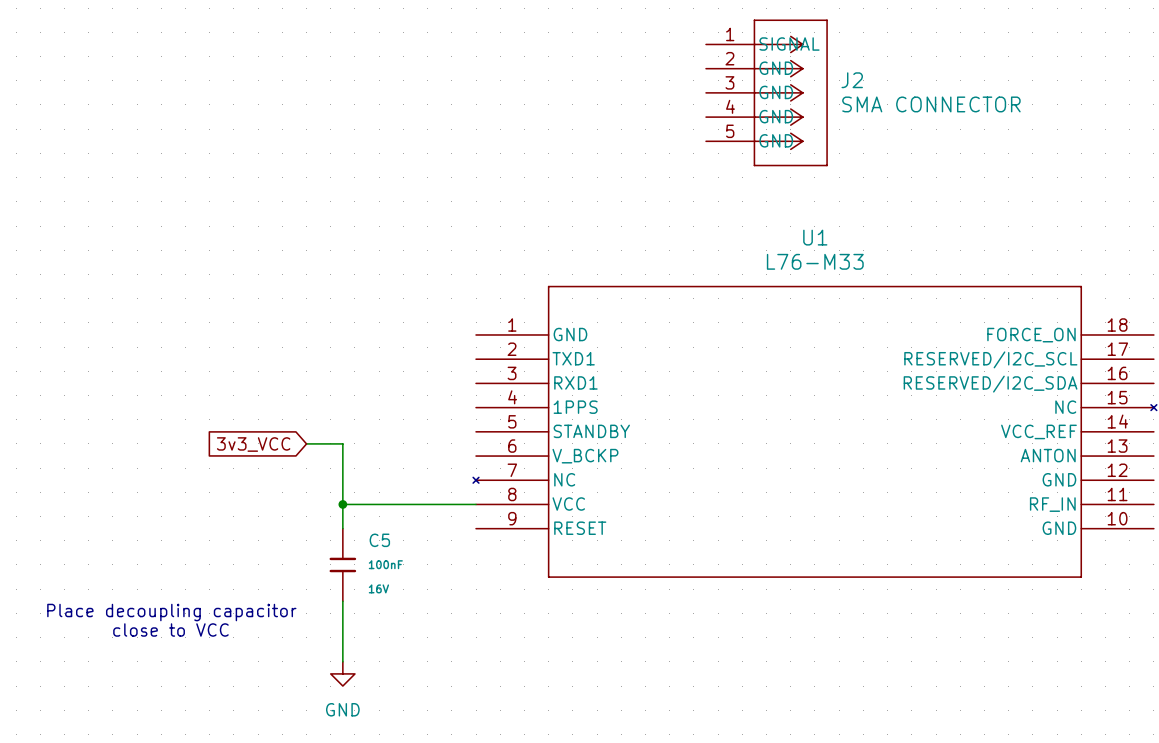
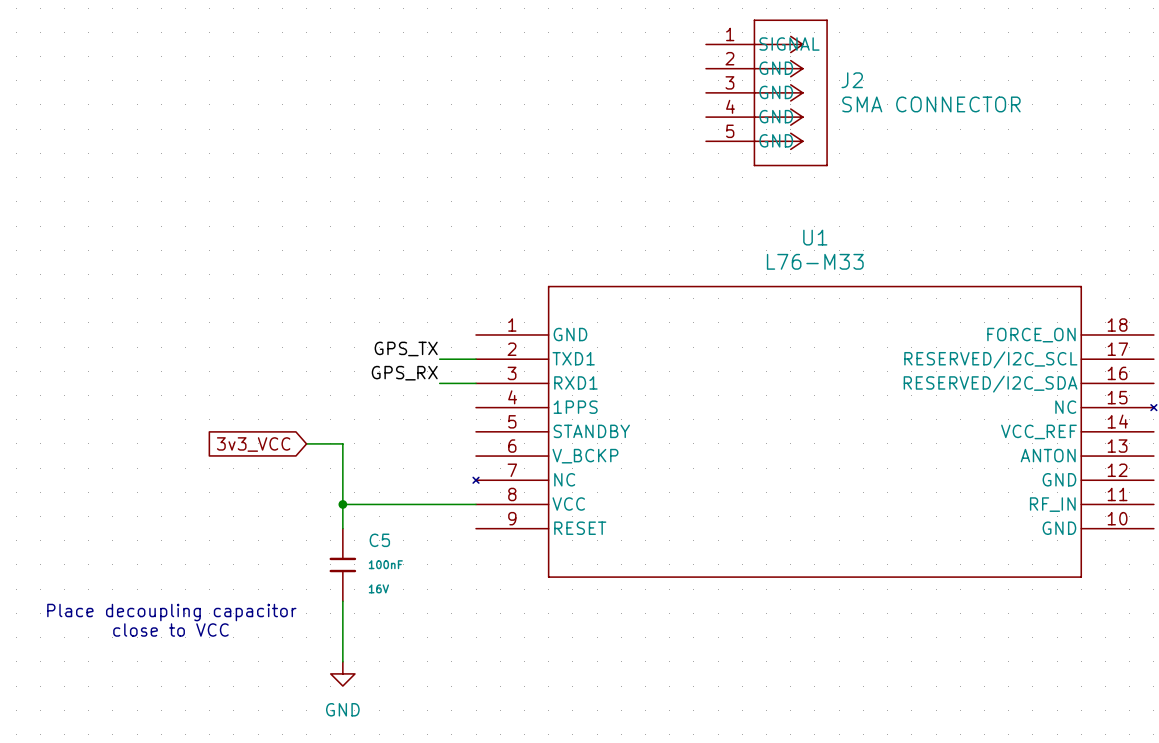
label: none -> GPS_TX (406, 348)
wire: none -> (439, 359) (476, 359)
label: none -> GPS_RX (404, 373)
wire: none -> (439, 383) (476, 383)

